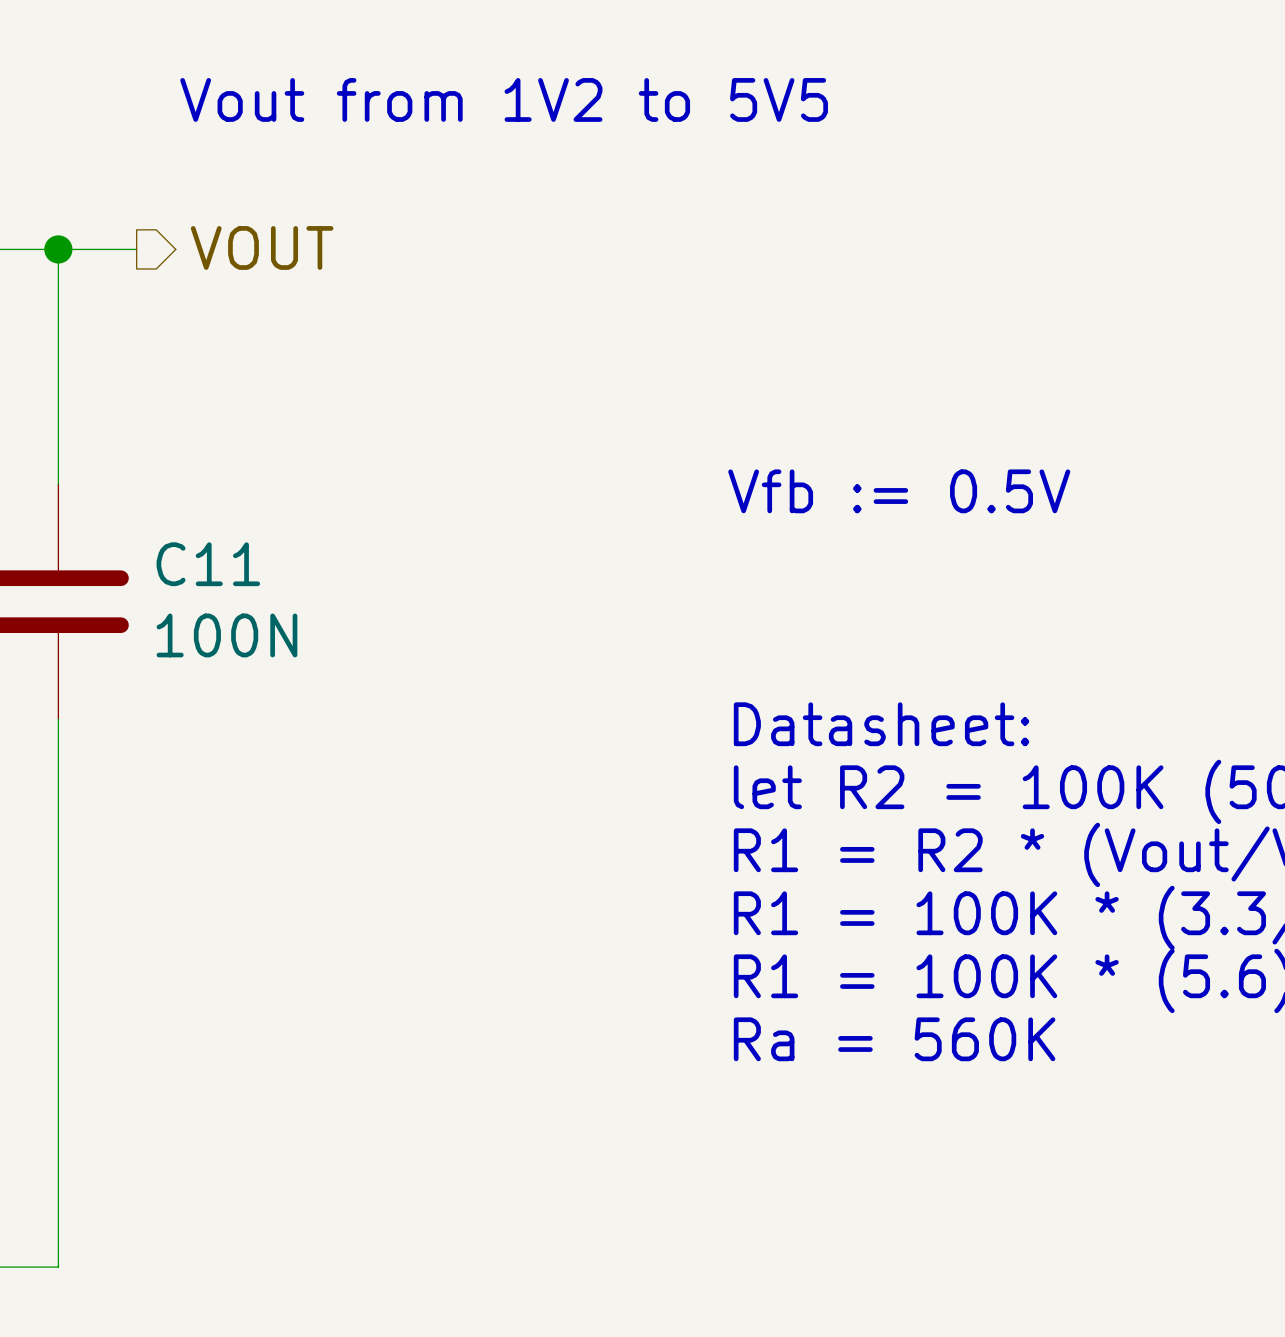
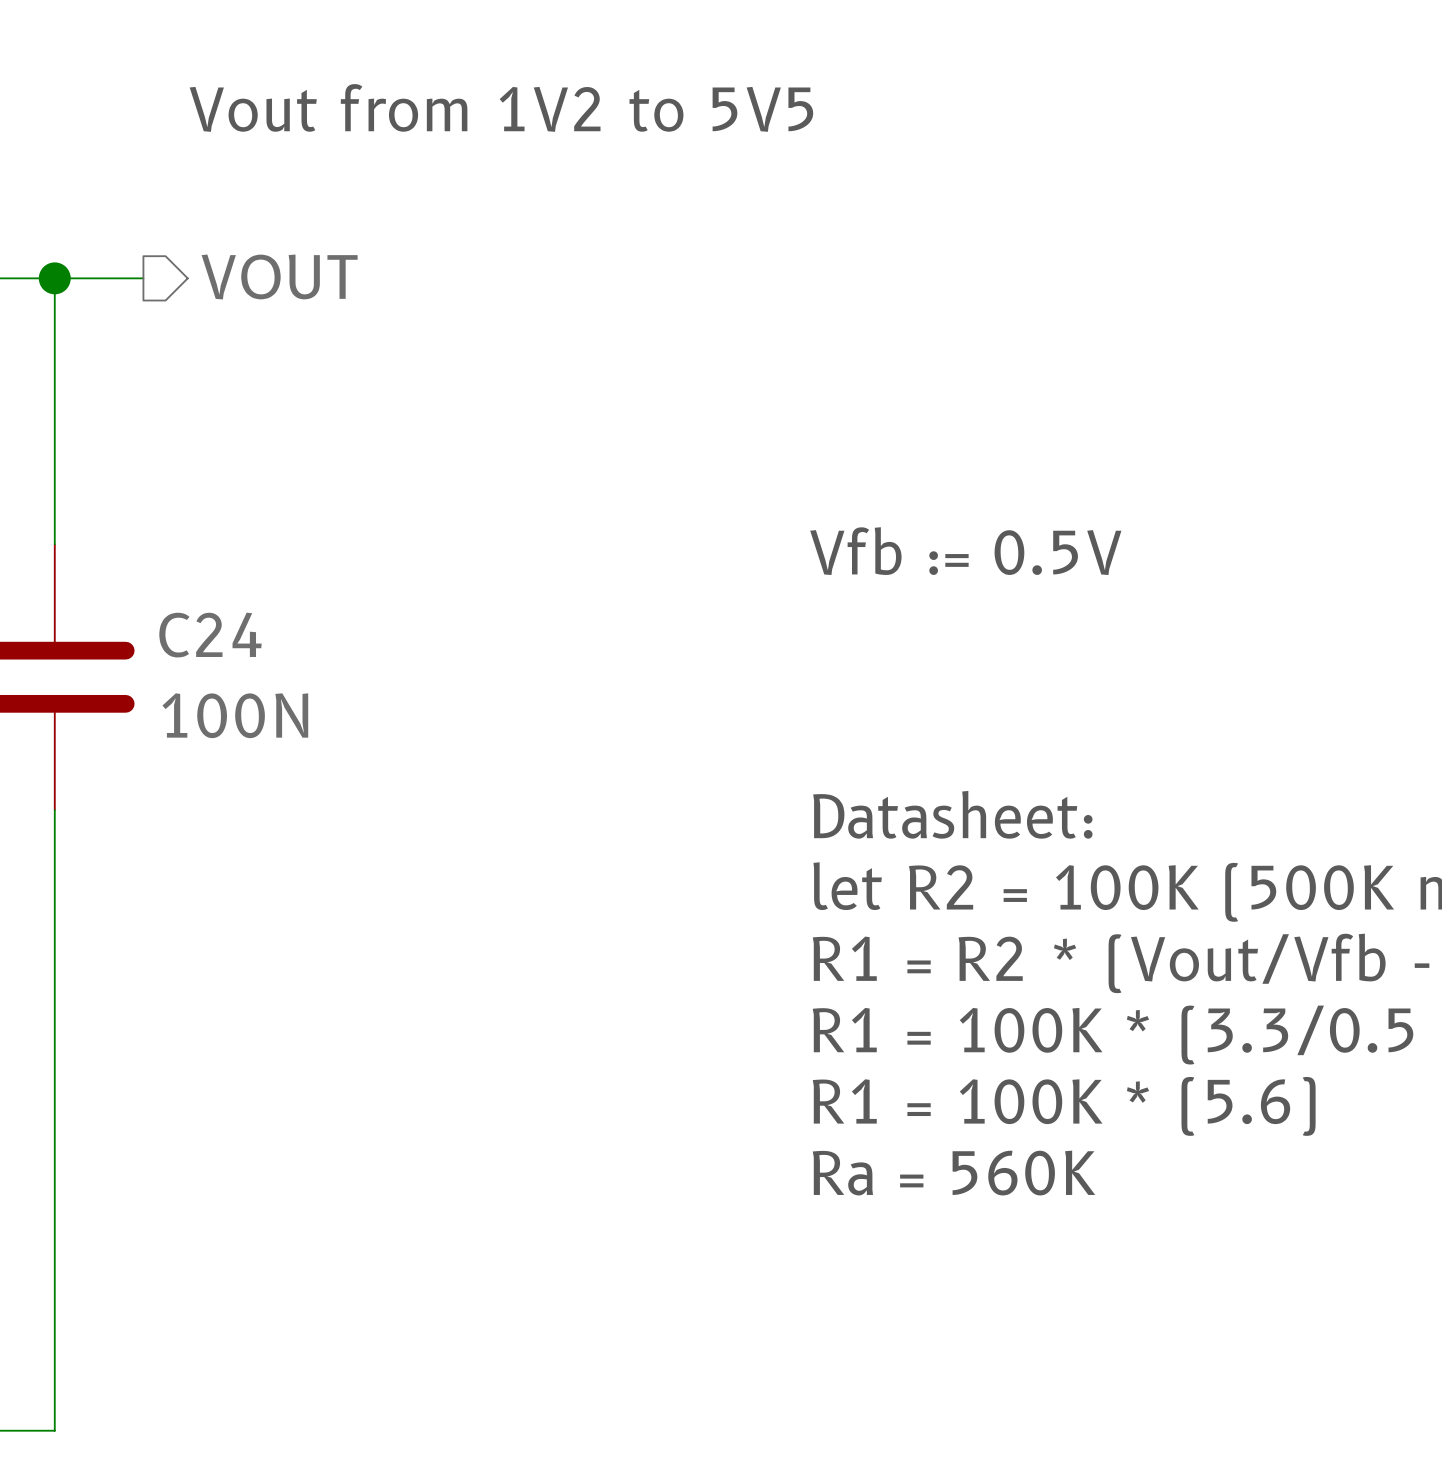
C11 name: C11 (208, 564) -> C24 (210, 635)

